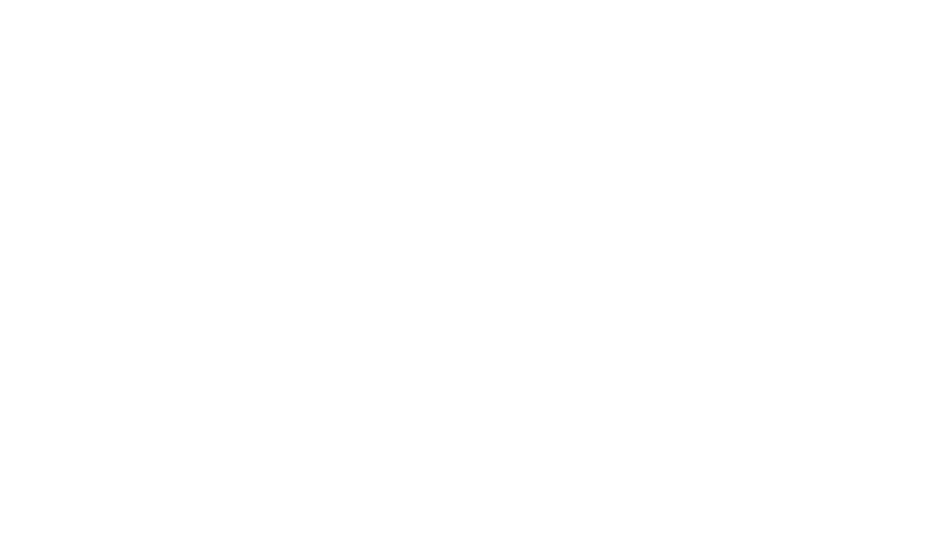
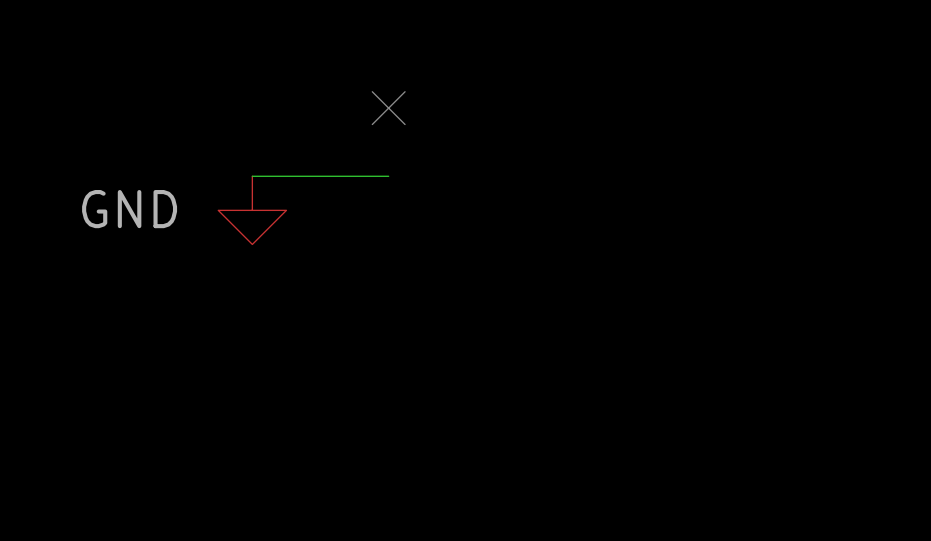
no-connect mark: none -> (388, 108)
wire: none -> (252, 176) (388, 176)
power symbol: none -> GND (252, 210)

